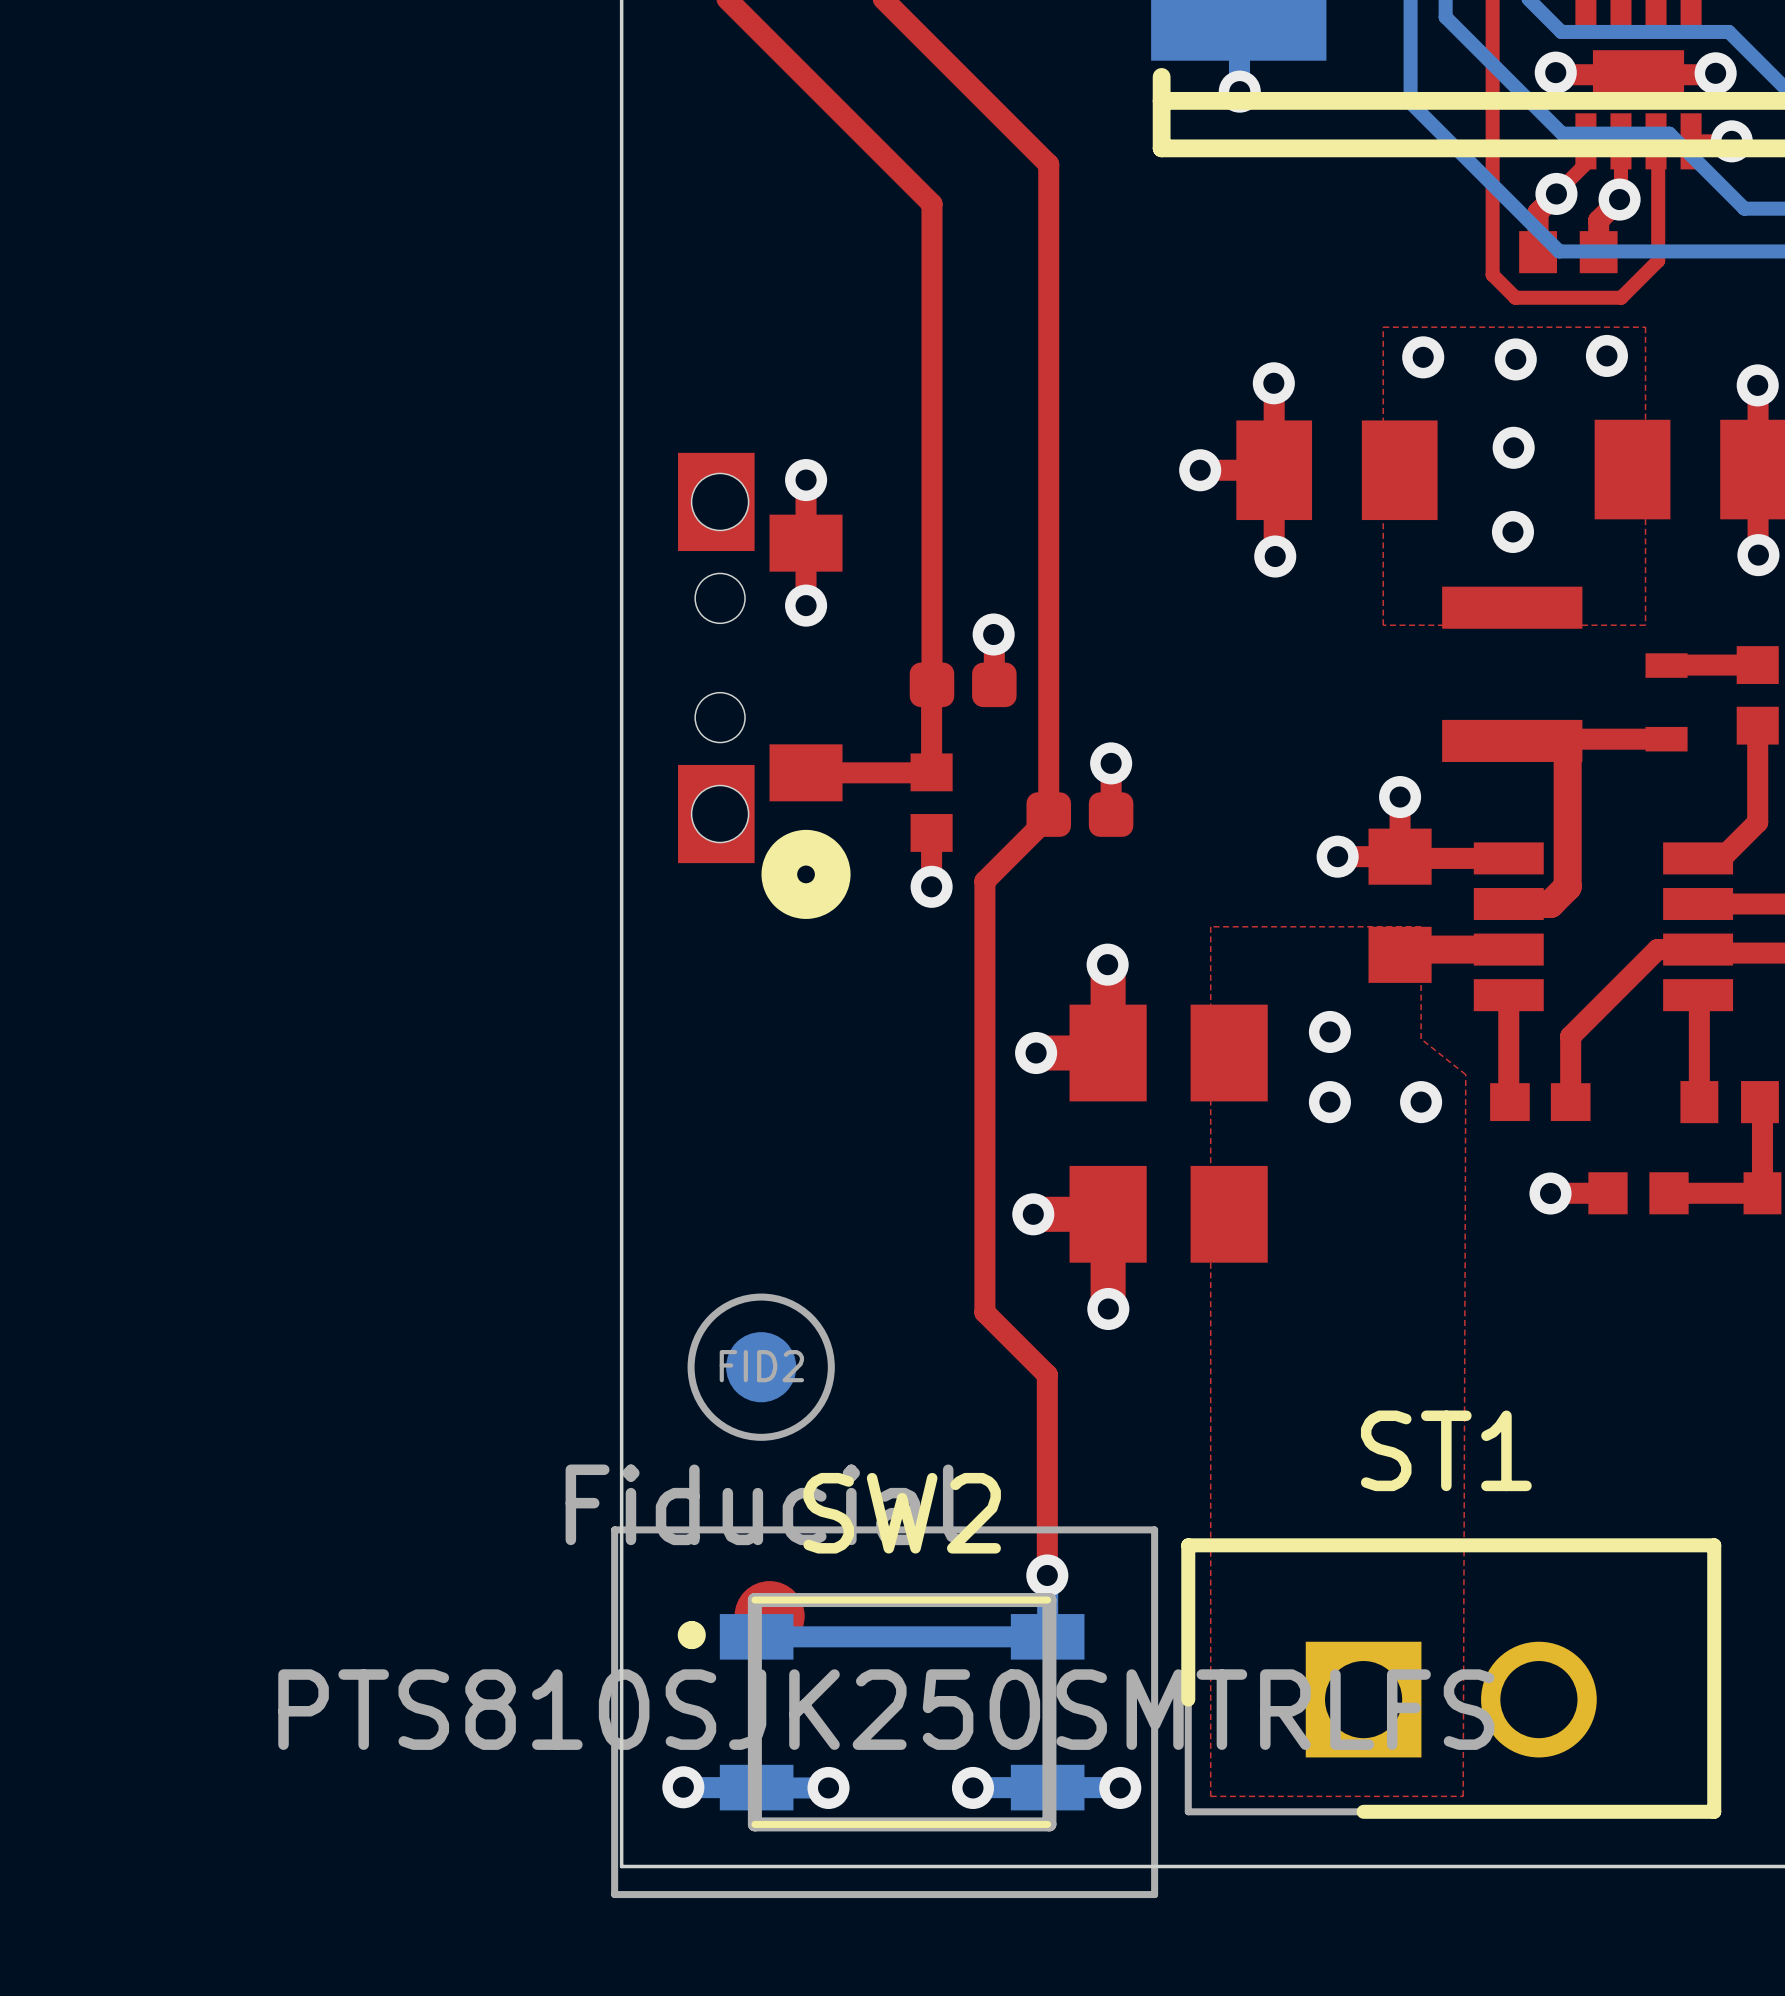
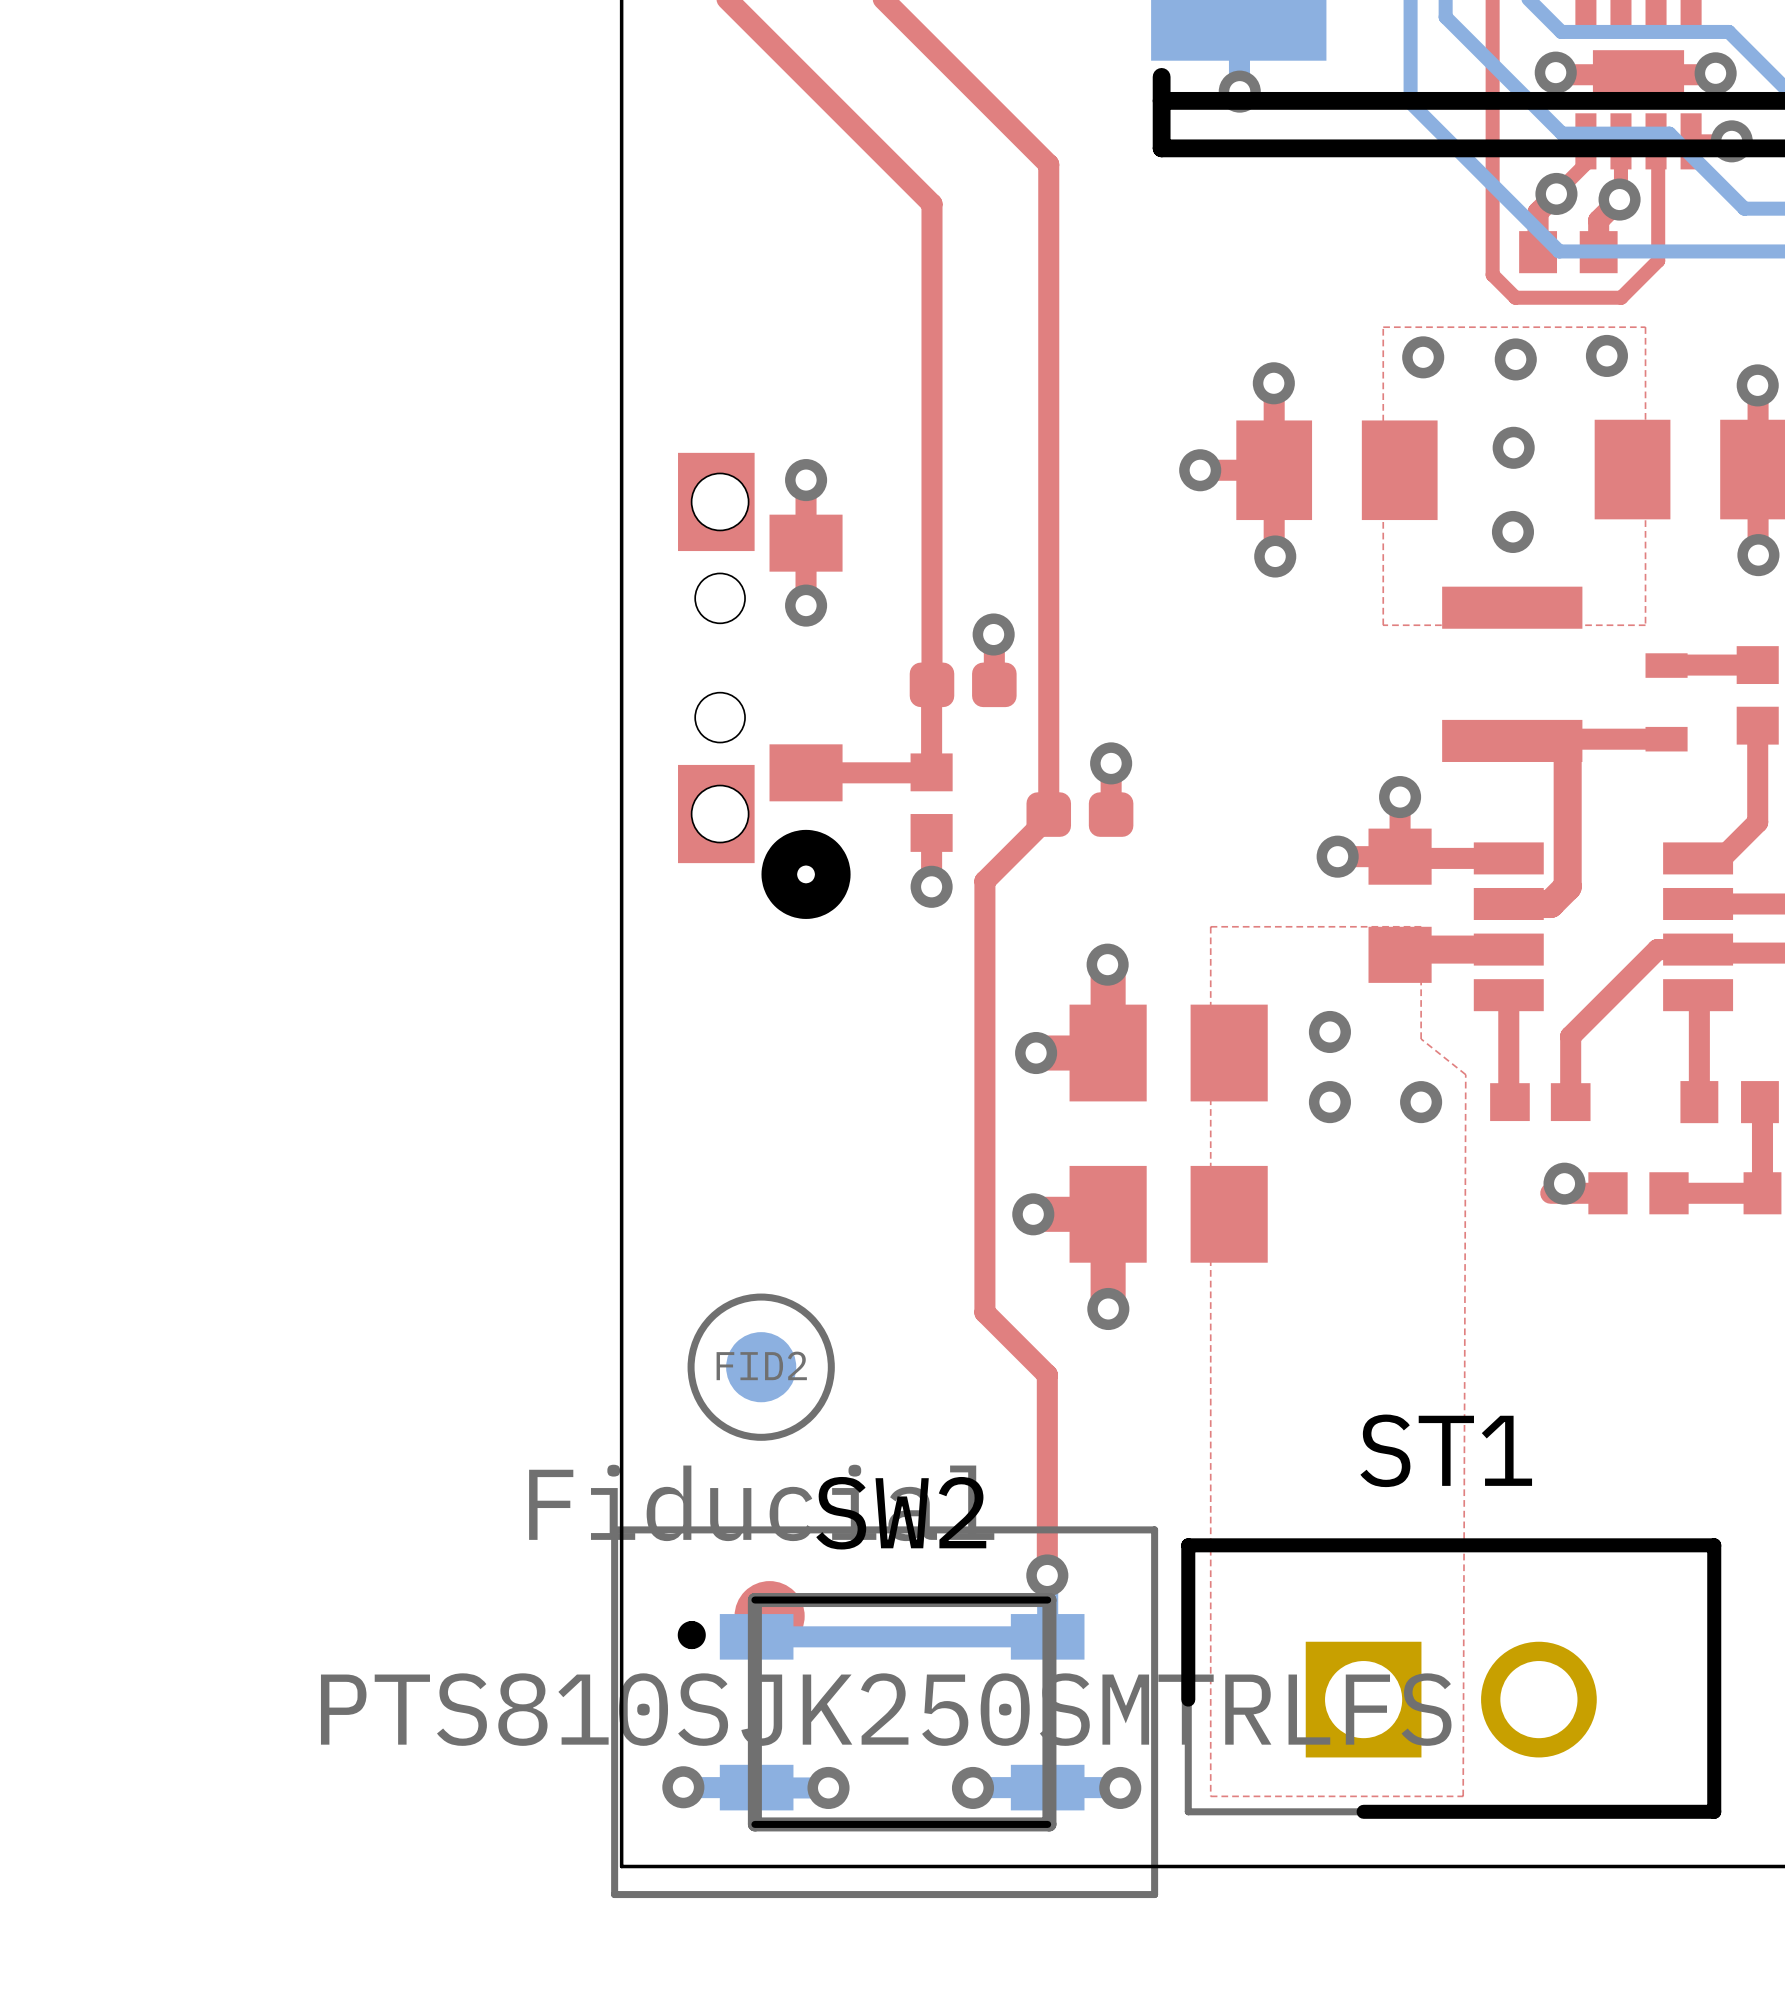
via position: (1550, 1193) -> (1564, 1183)

